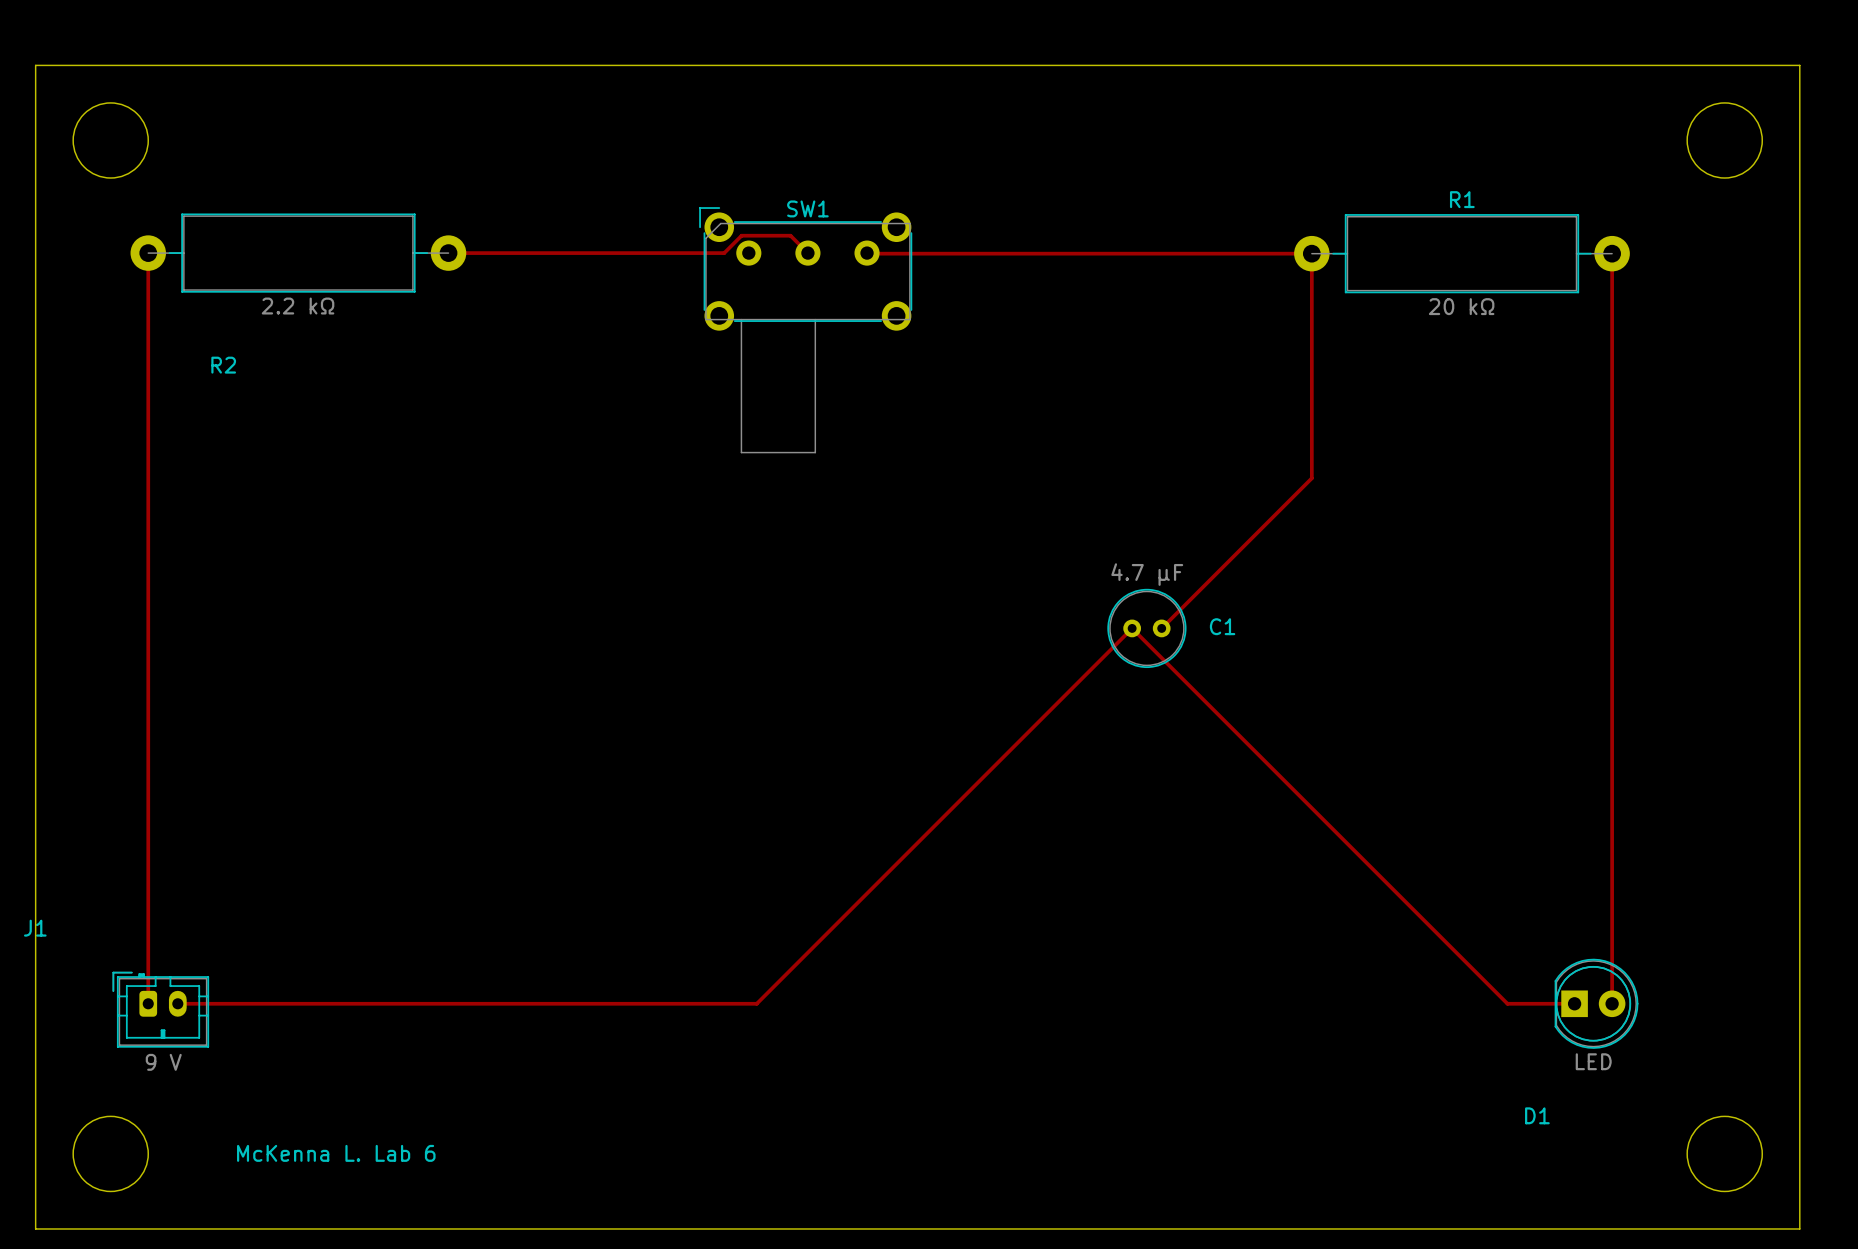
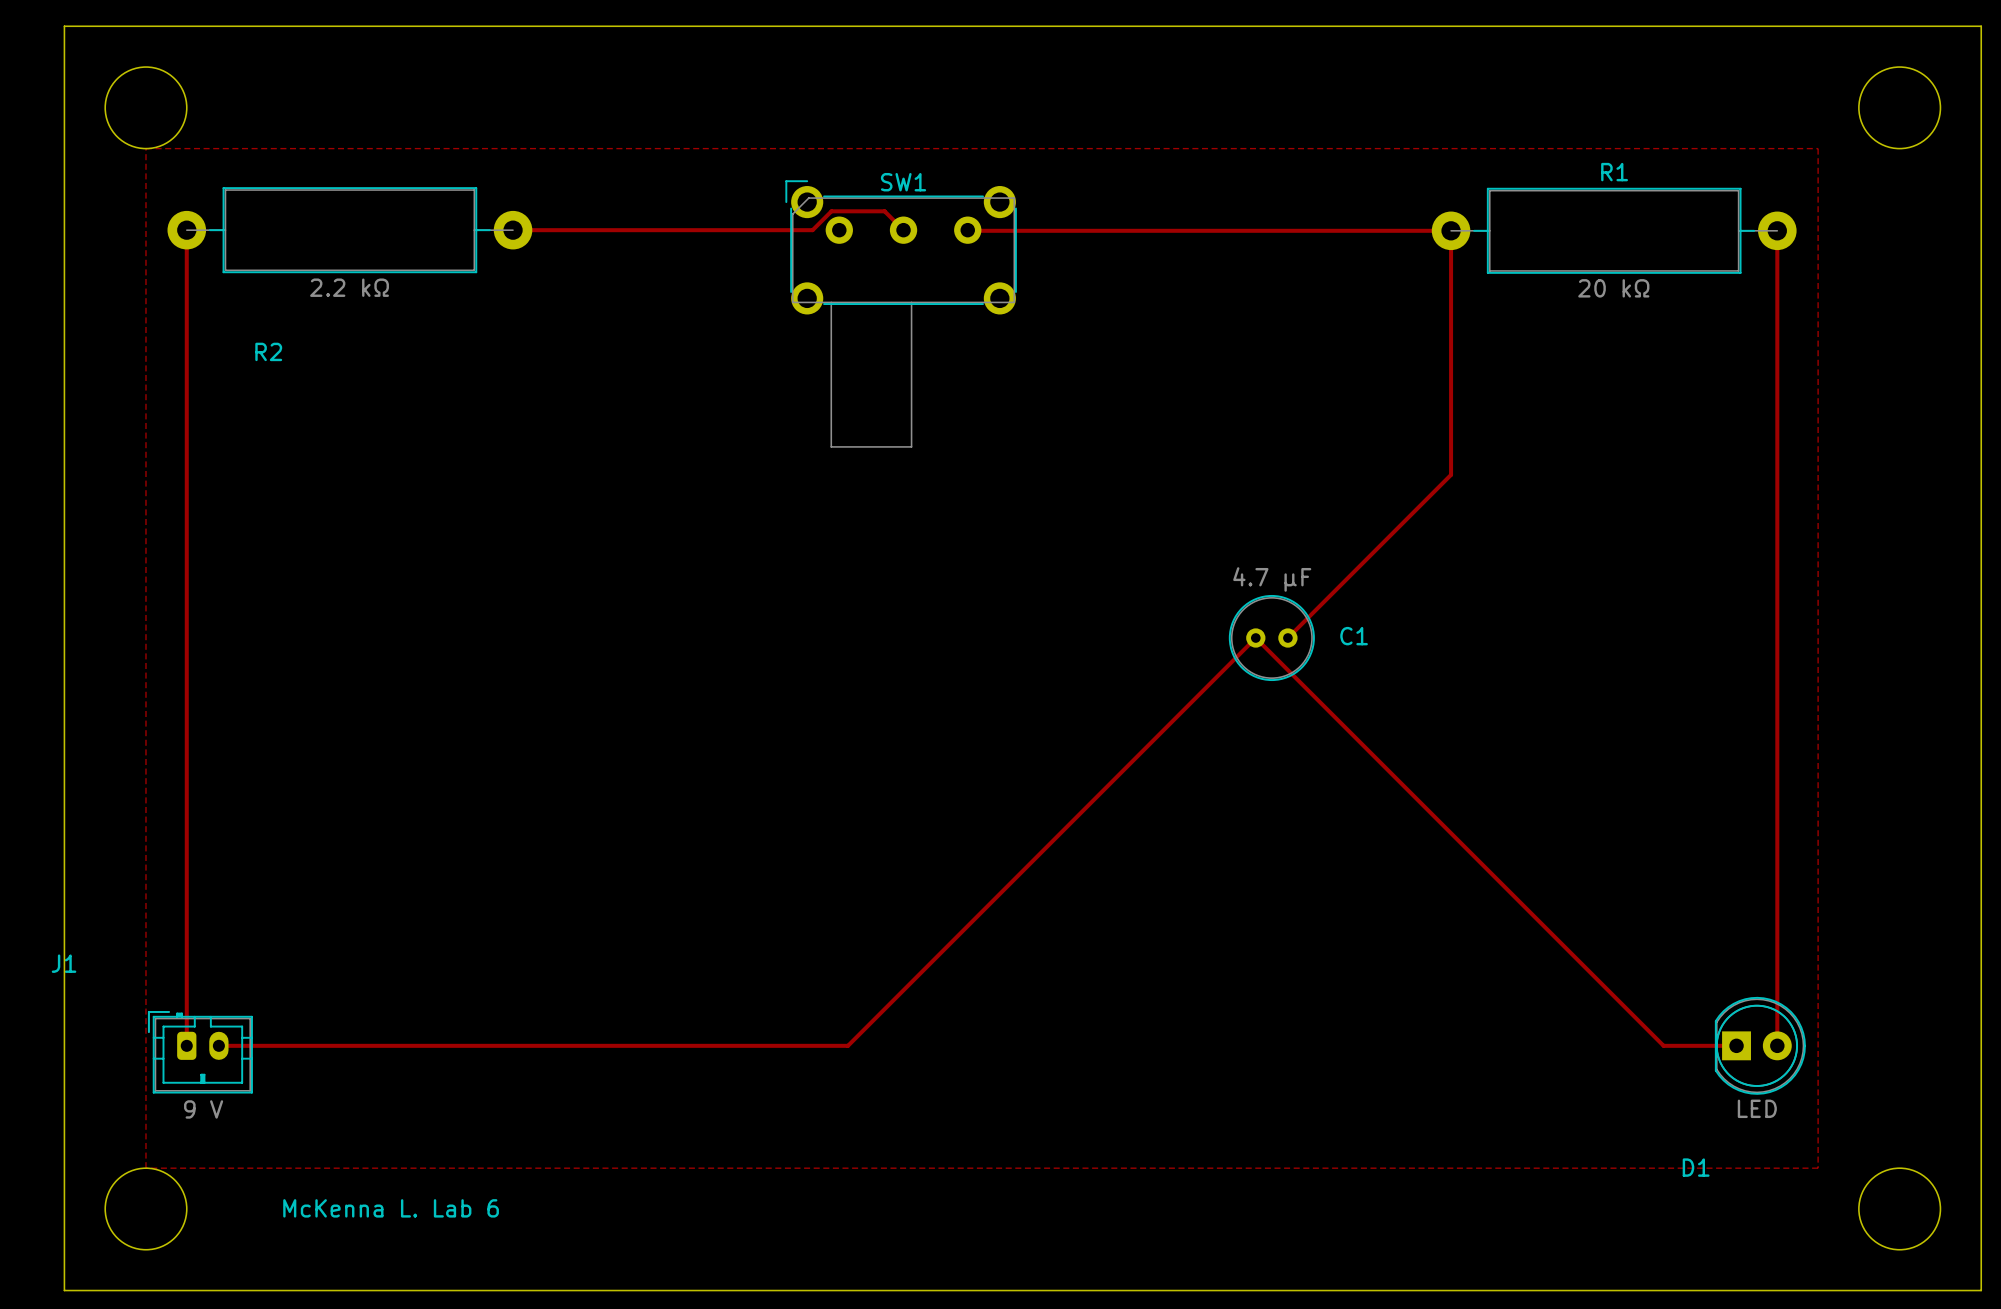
top zone outline: none -> (145, 148) (145, 1168) (1818, 1168) (1818, 148) (145, 148)

